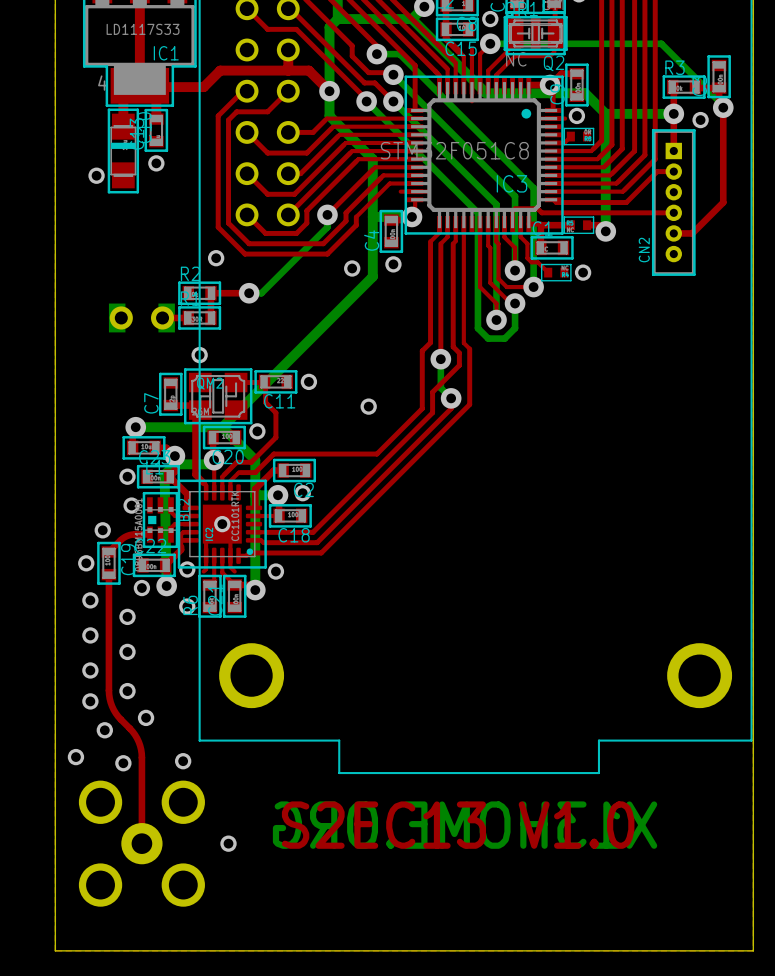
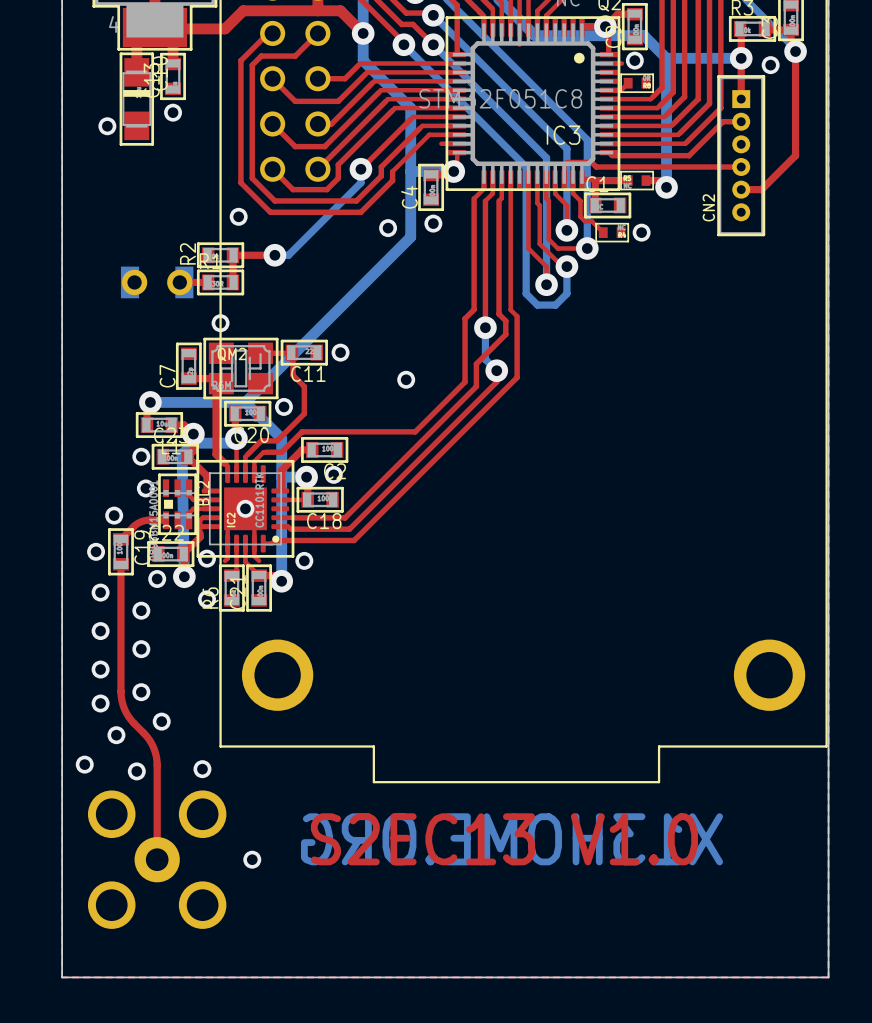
R2 name rotation: 0° (190, 273) -> 90° counterclockwise (187, 253)

